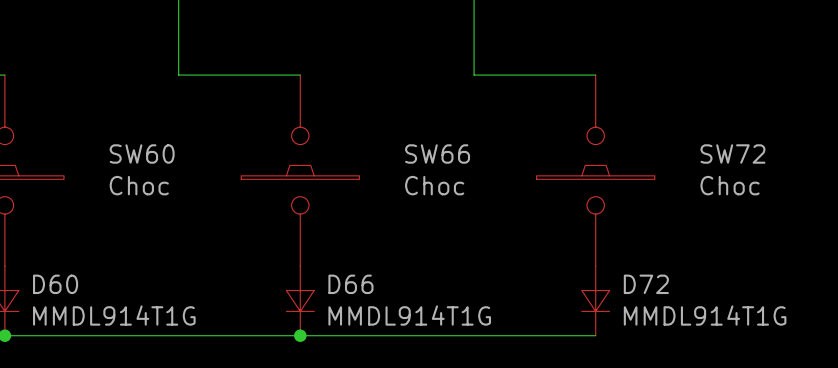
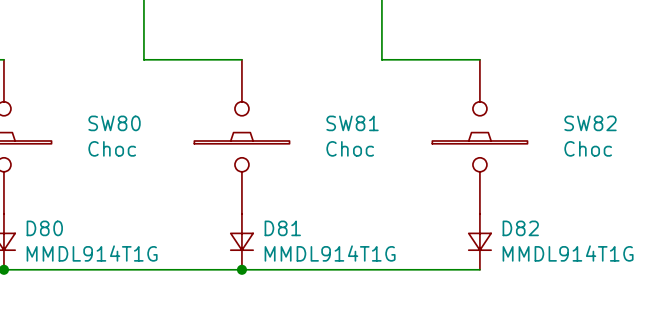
SW60 name: SW60 (142, 154) -> SW80 (114, 123)
SW66 name: SW66 (437, 154) -> SW81 (352, 123)
SW72 name: SW72 (732, 154) -> SW82 (590, 123)
D60 name: D60 (55, 284) -> D80 (44, 228)
D66 name: D66 (350, 284) -> D81 (282, 228)
D72 name: D72 (646, 284) -> D82 (520, 228)

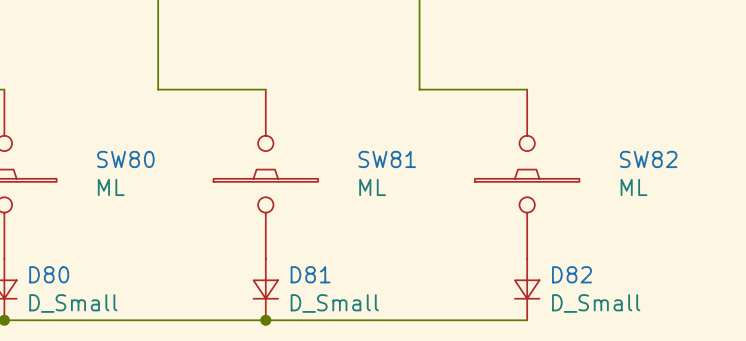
SW80 value: Choc (112, 148) -> ML (111, 187)
SW81 value: Choc (350, 148) -> ML (372, 187)
SW82 value: Choc (588, 148) -> ML (634, 187)
D80 value: MMDL914T1G (92, 253) -> D_Small (73, 303)
D81 value: MMDL914T1G (330, 253) -> D_Small (334, 303)
D82 value: MMDL914T1G (568, 253) -> D_Small (596, 303)

